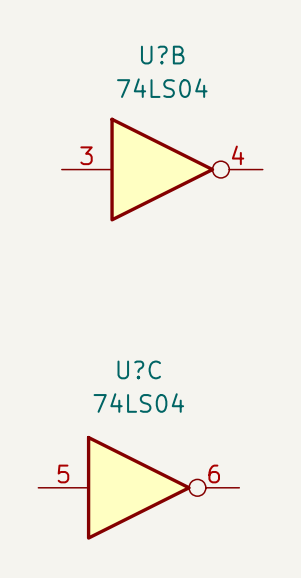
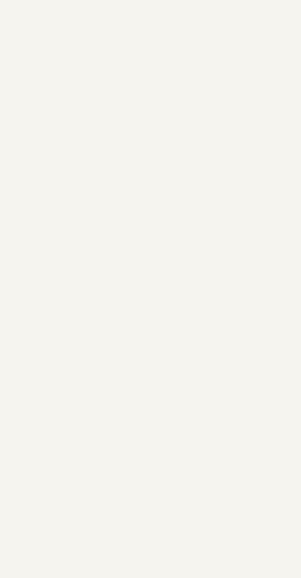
U?B: 74LS04 (162, 169) -> none
U?C: 74LS04 (138, 487) -> none

